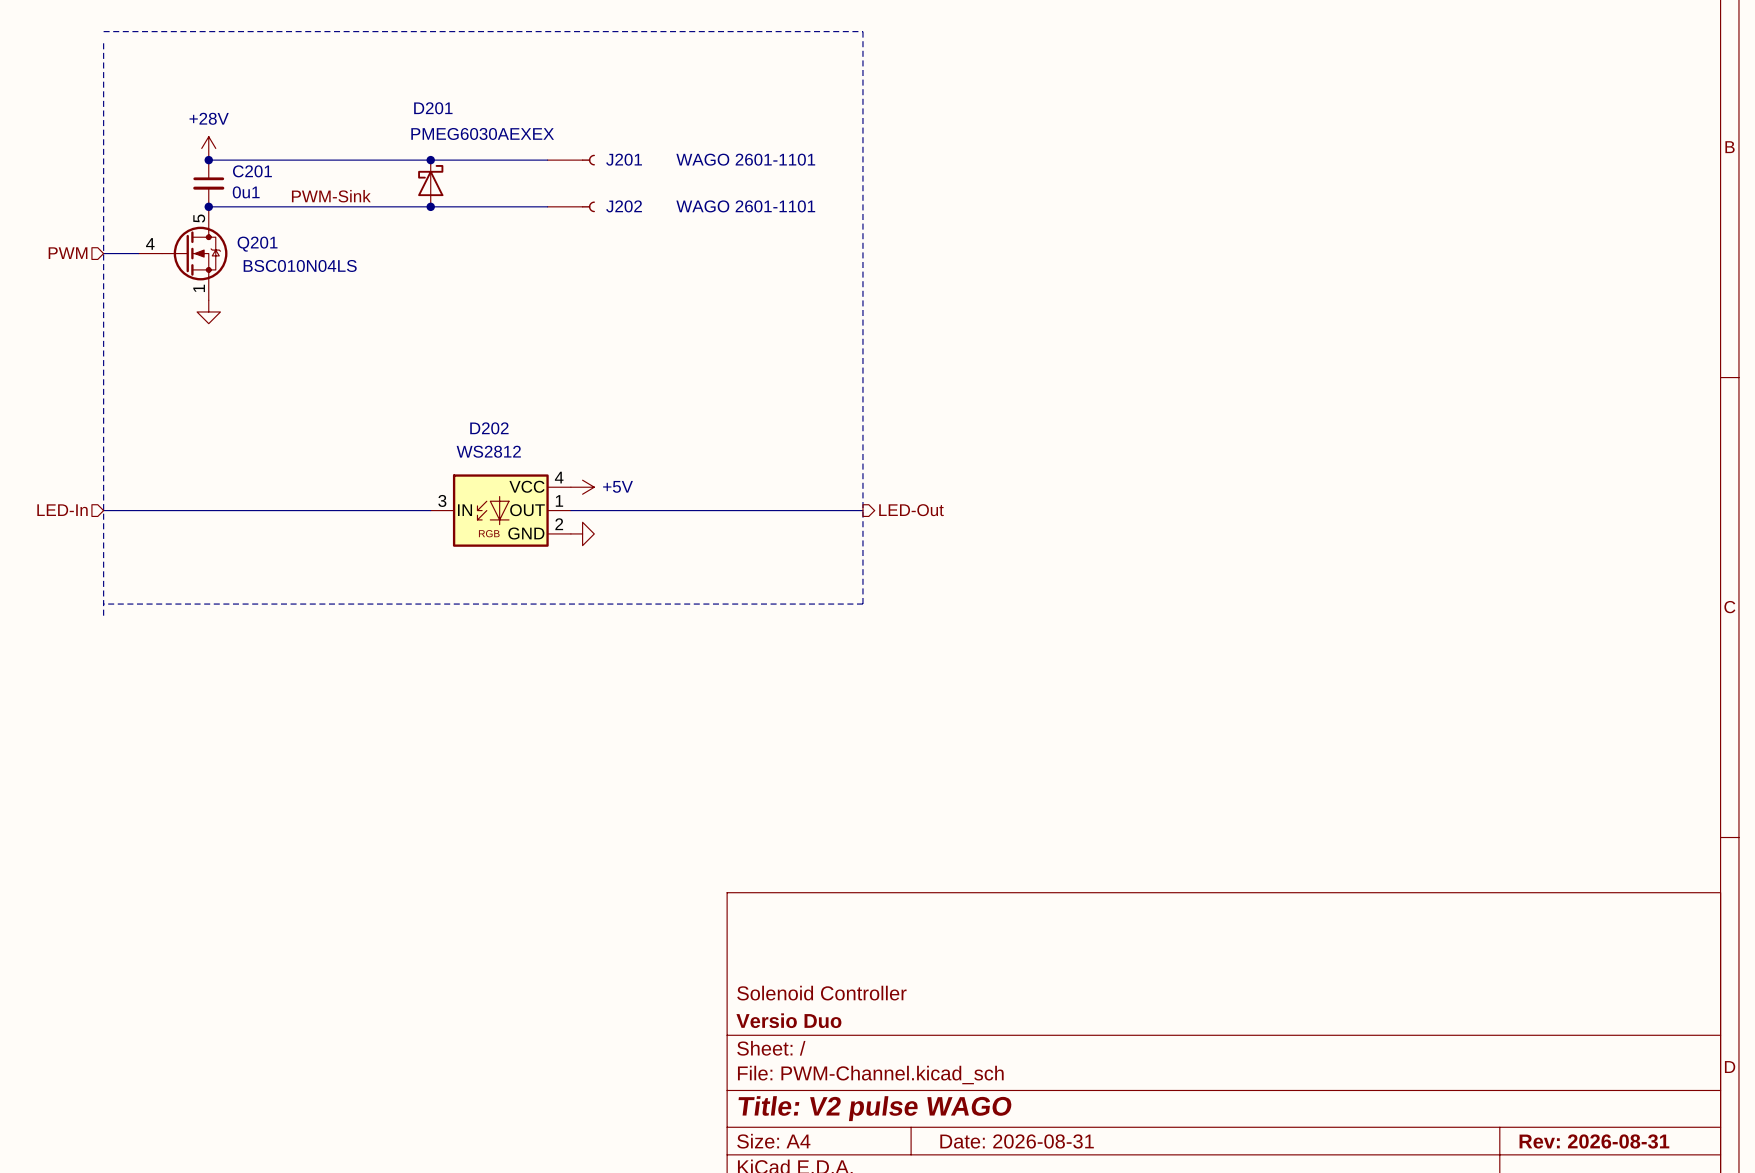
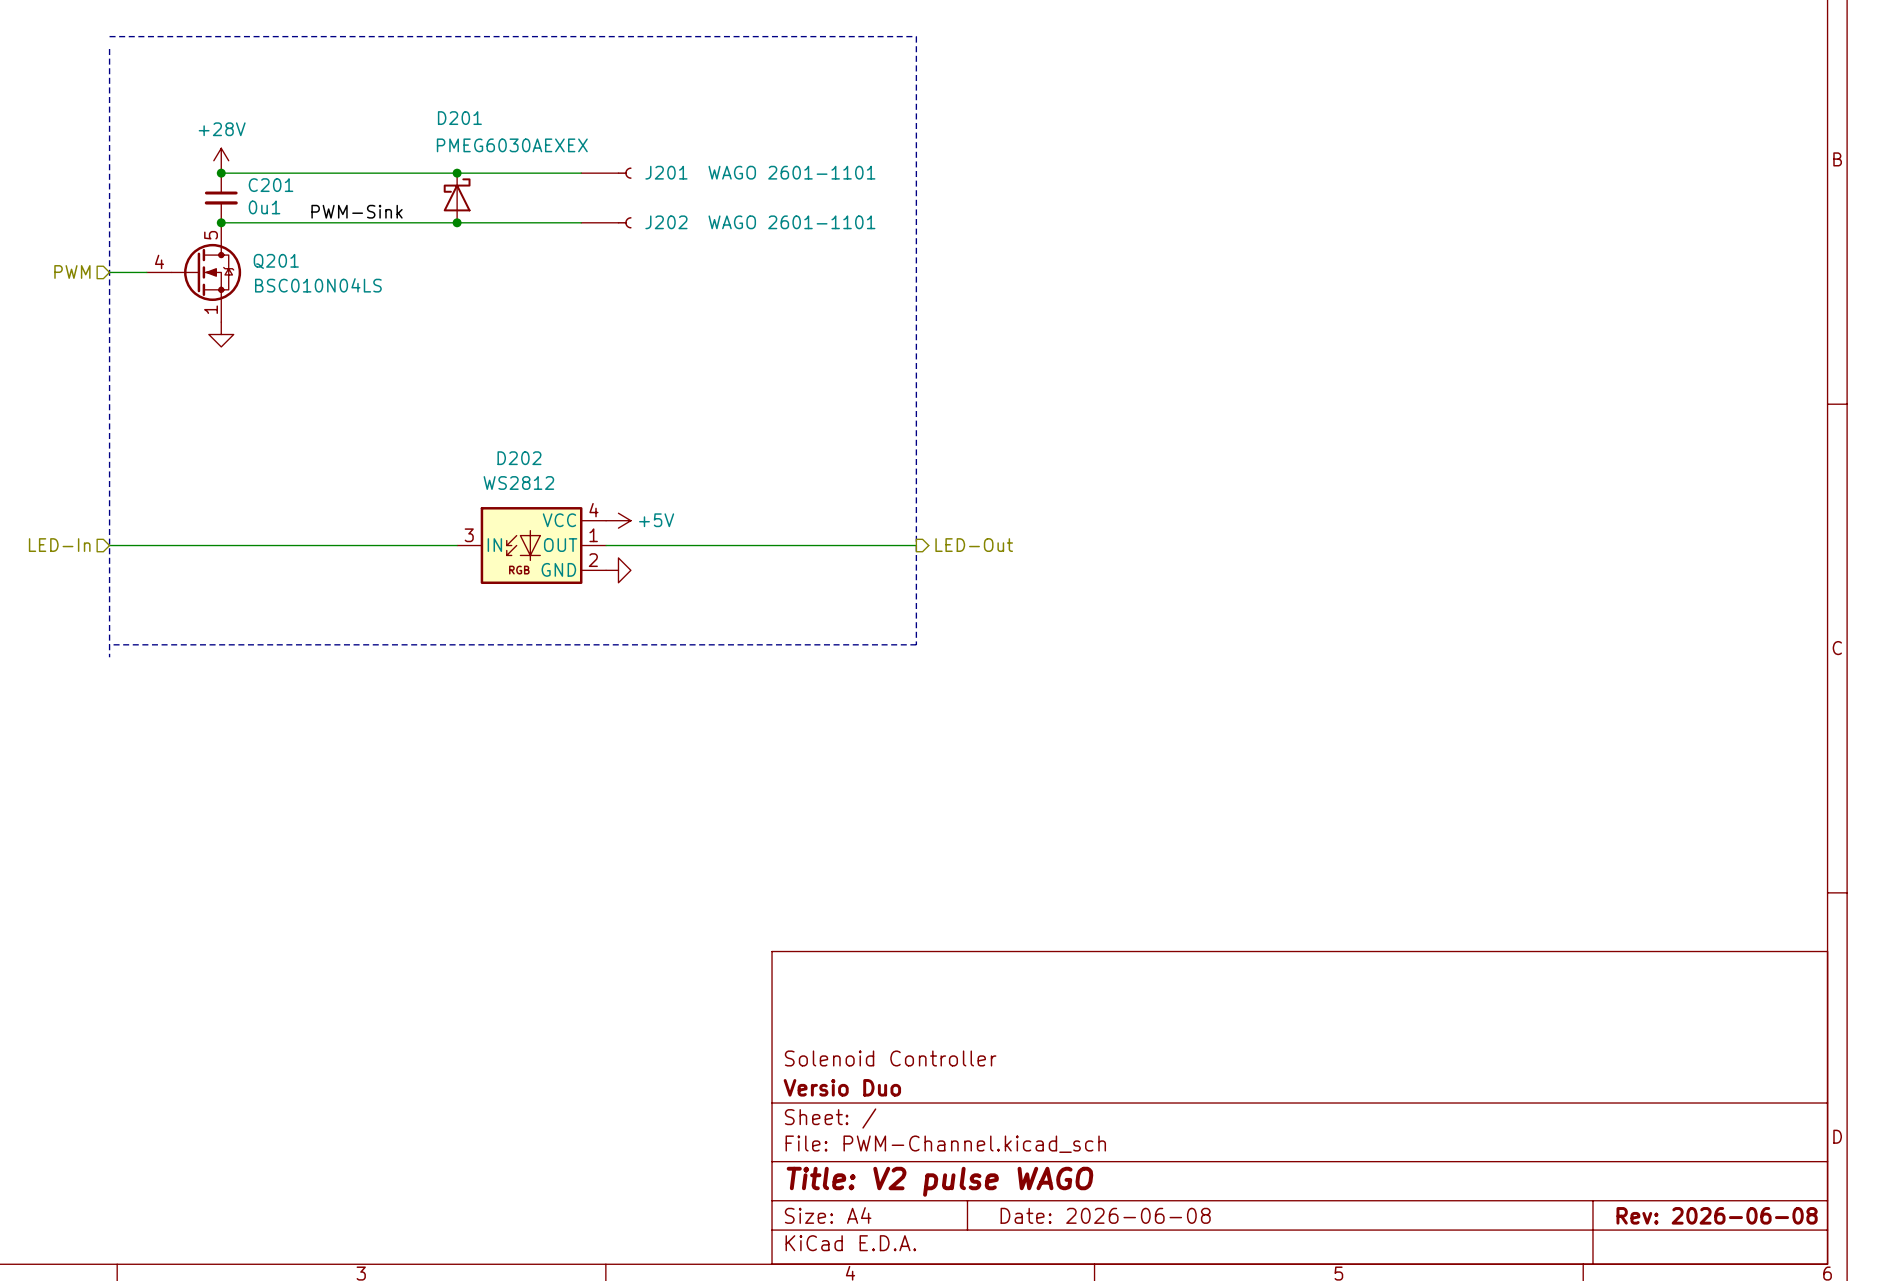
title block: Date: 2026-08-31 (1017, 1141) -> Date: 2026-06-08 (1105, 1215)
title block: Rev: 2026-08-31 (1594, 1141) -> Rev: 2026-06-08 (1717, 1215)

